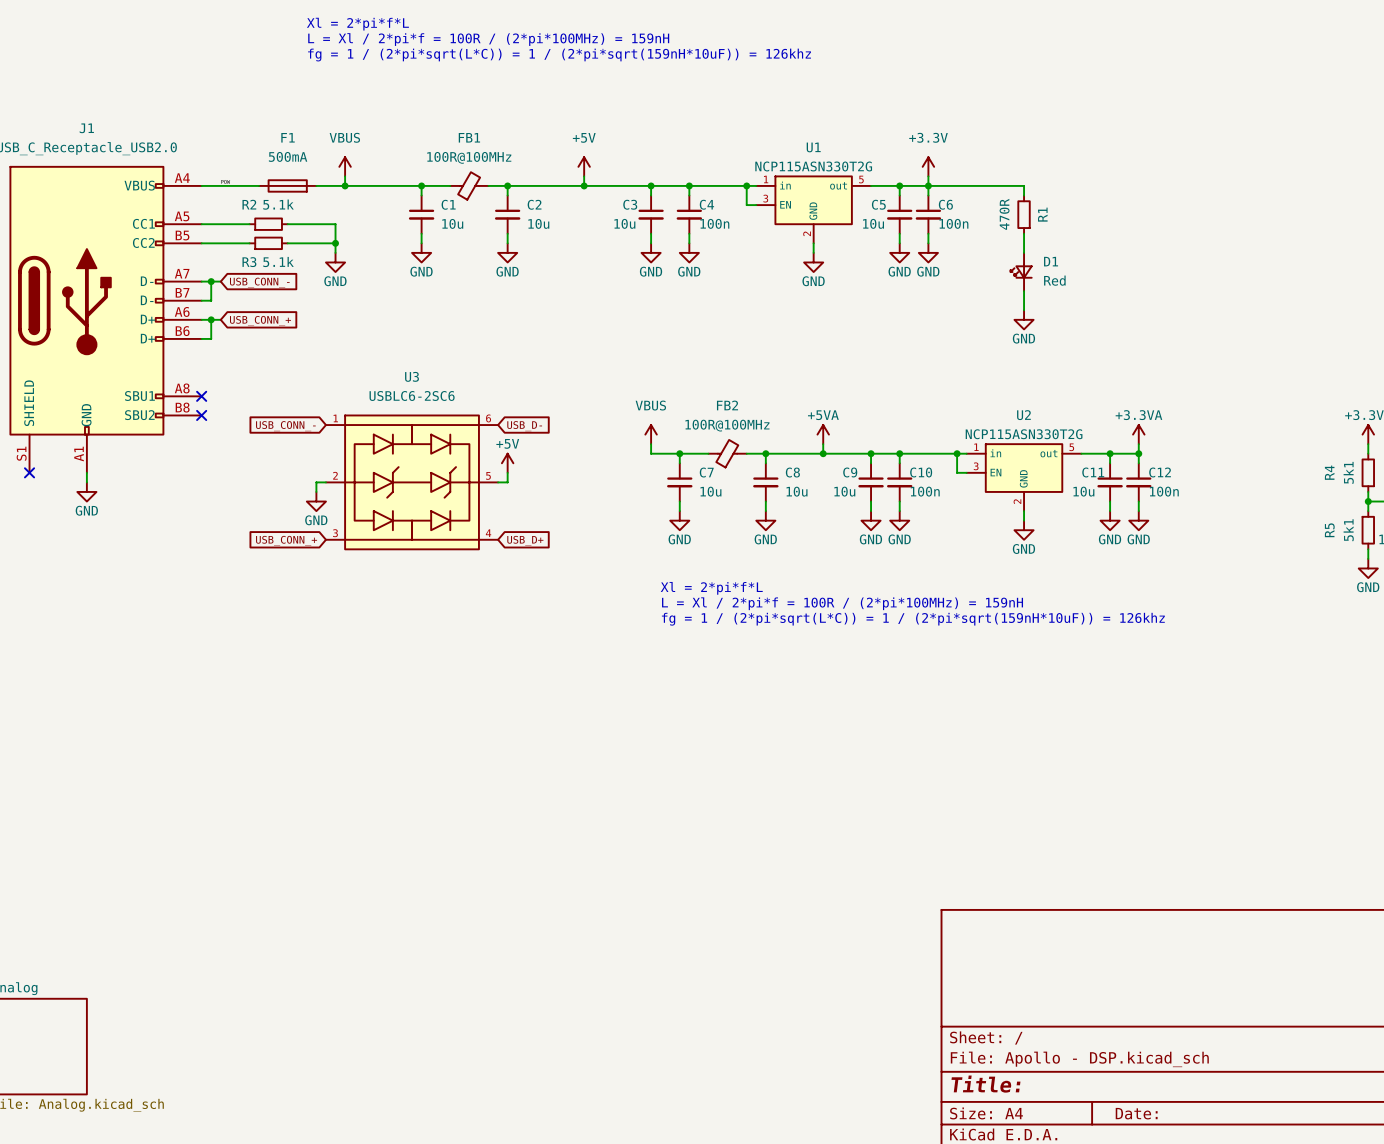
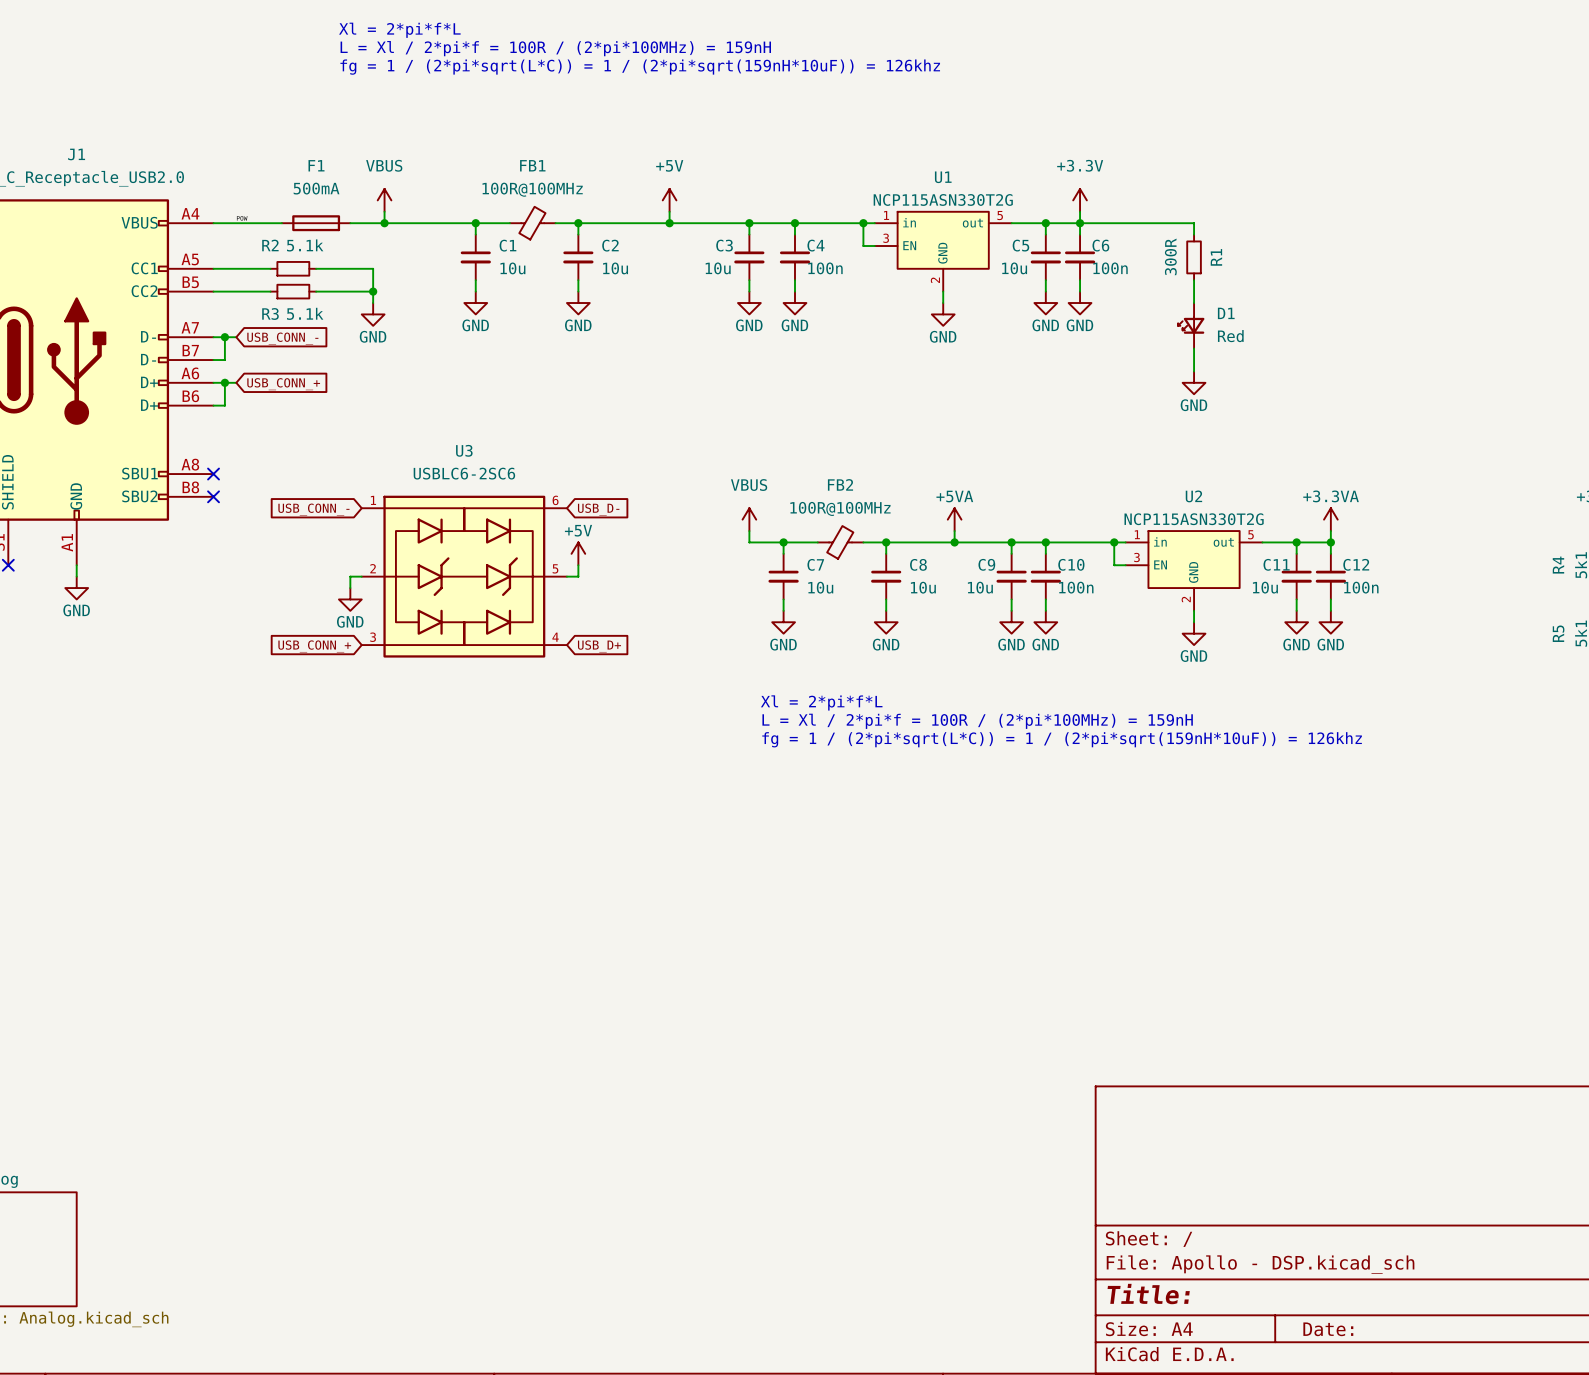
R1 value: 470R (1004, 214) -> 300R (1170, 256)

